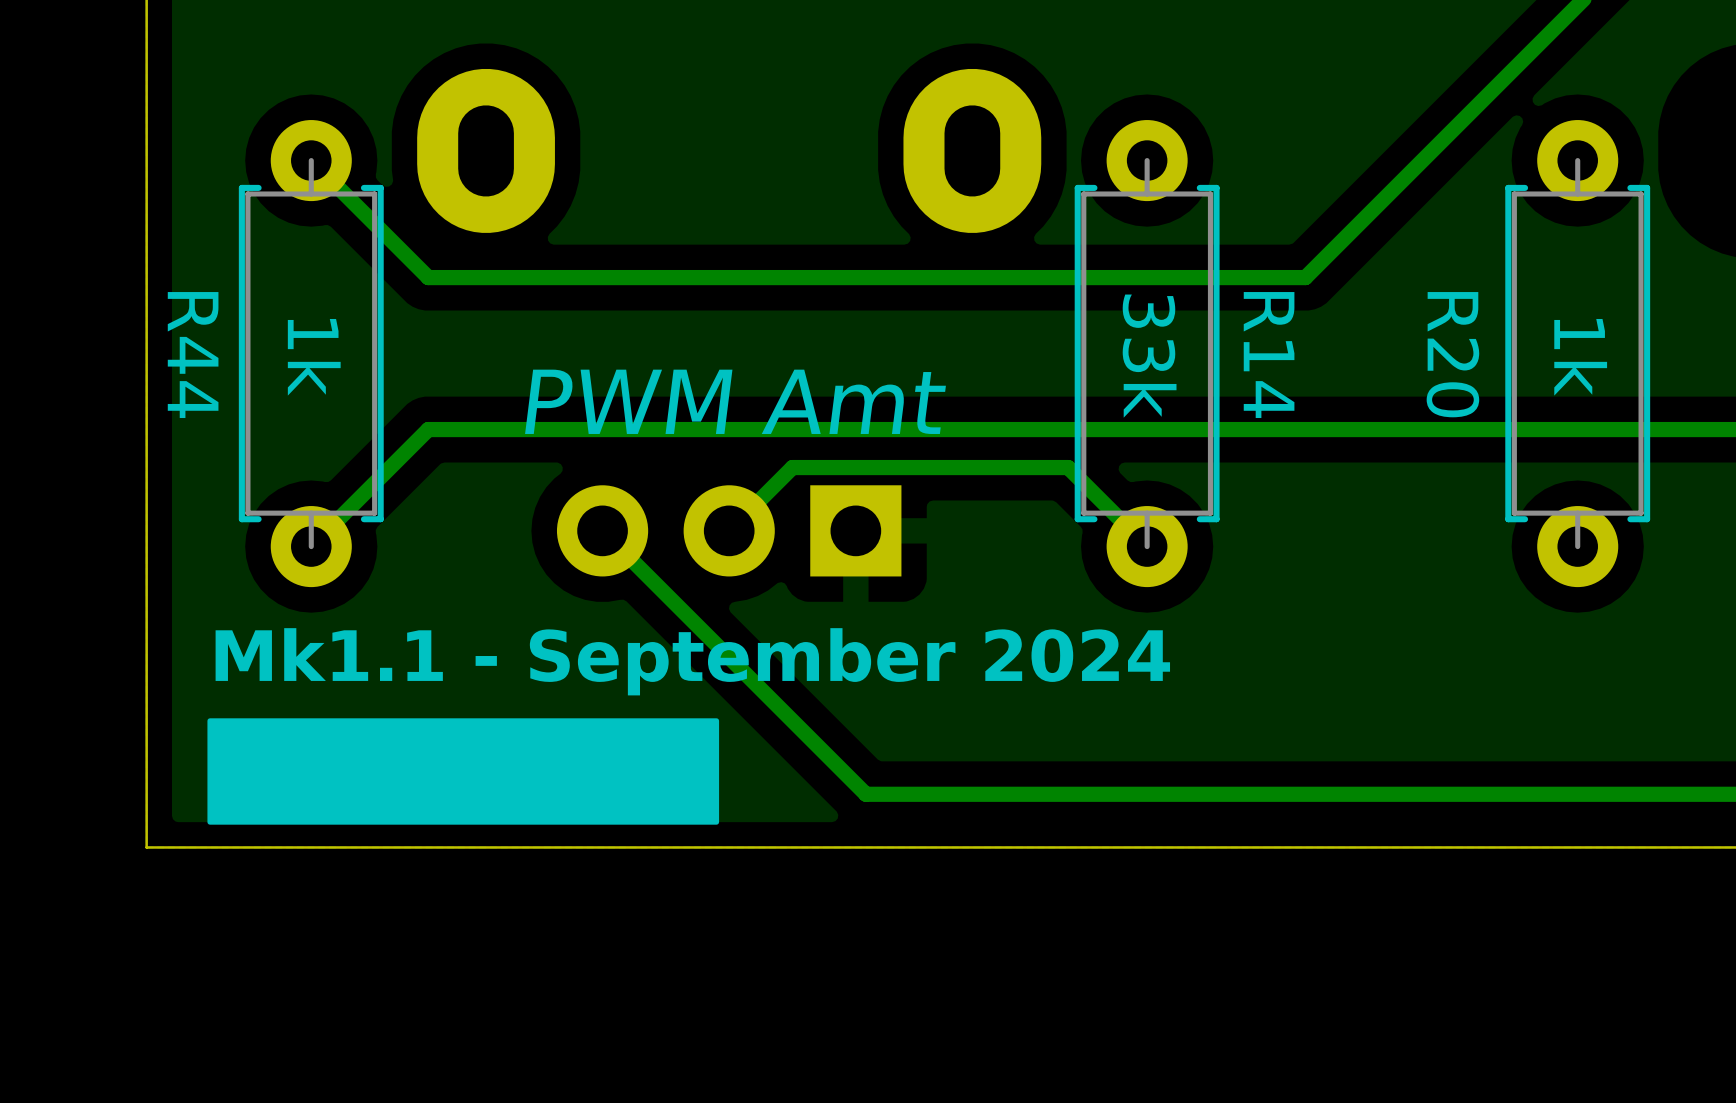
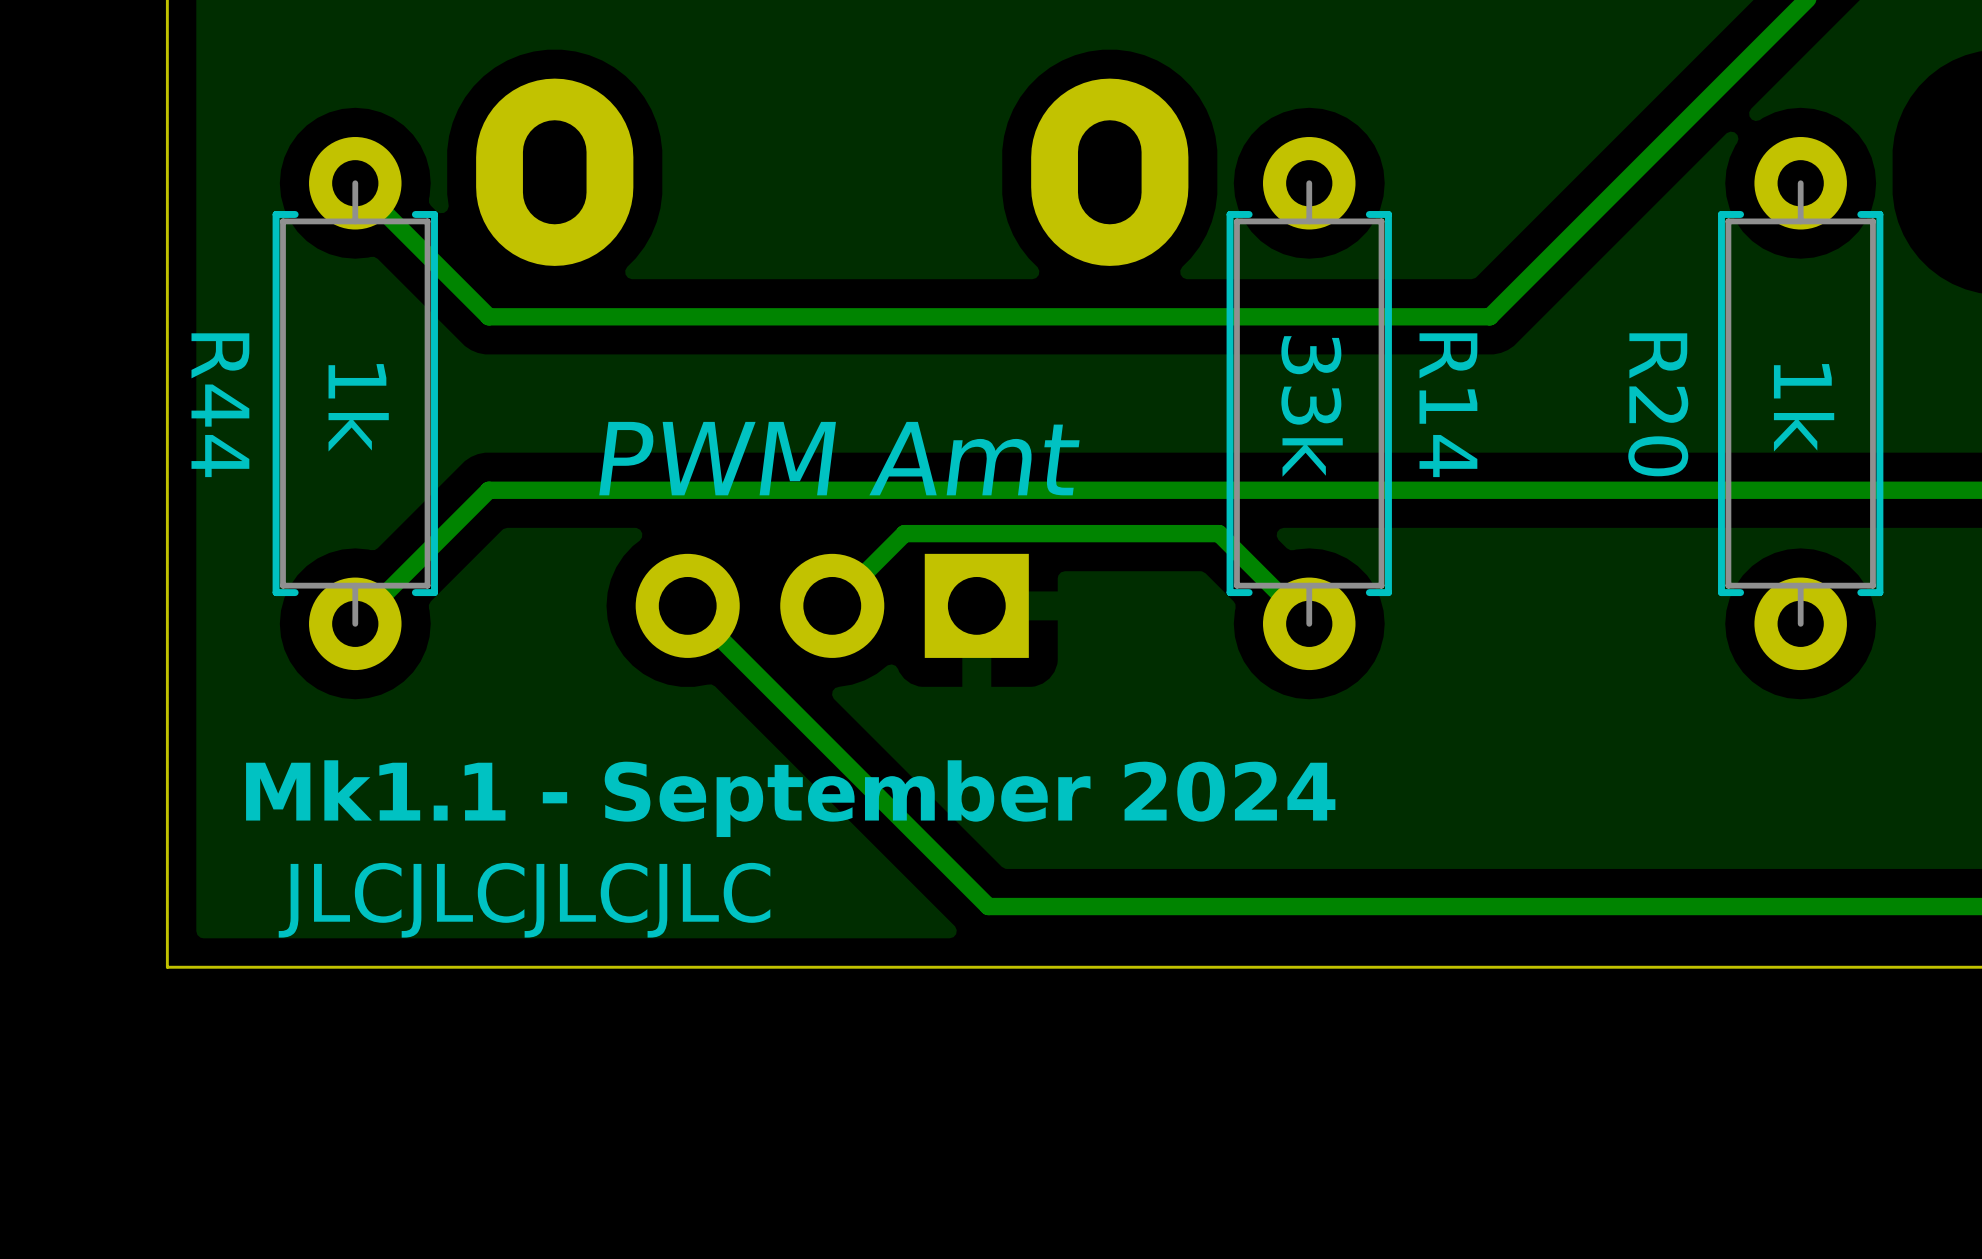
text position: Mk1.1 - September 2024 (692, 661) -> Mk1.1 - September 2024 (790, 798)
drawing: [207, 718, 720, 825] -> none
text: none -> JLCJLCJLCJLC (524, 900)

